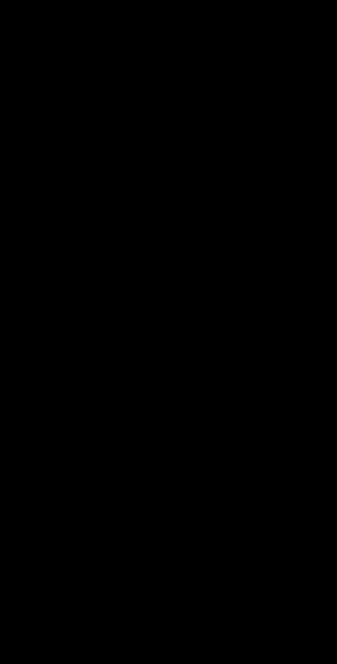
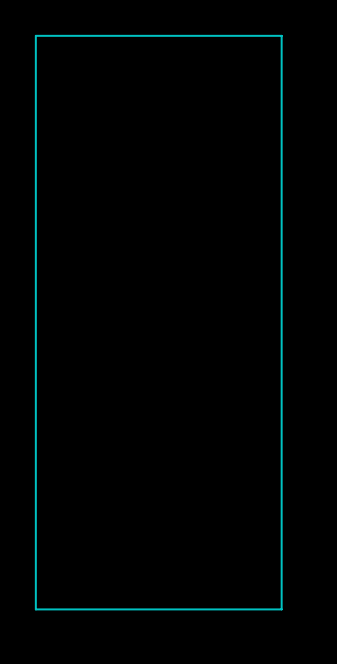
line: none -> (35, 35) (281, 35) (281, 609) (35, 609) (35, 35)

